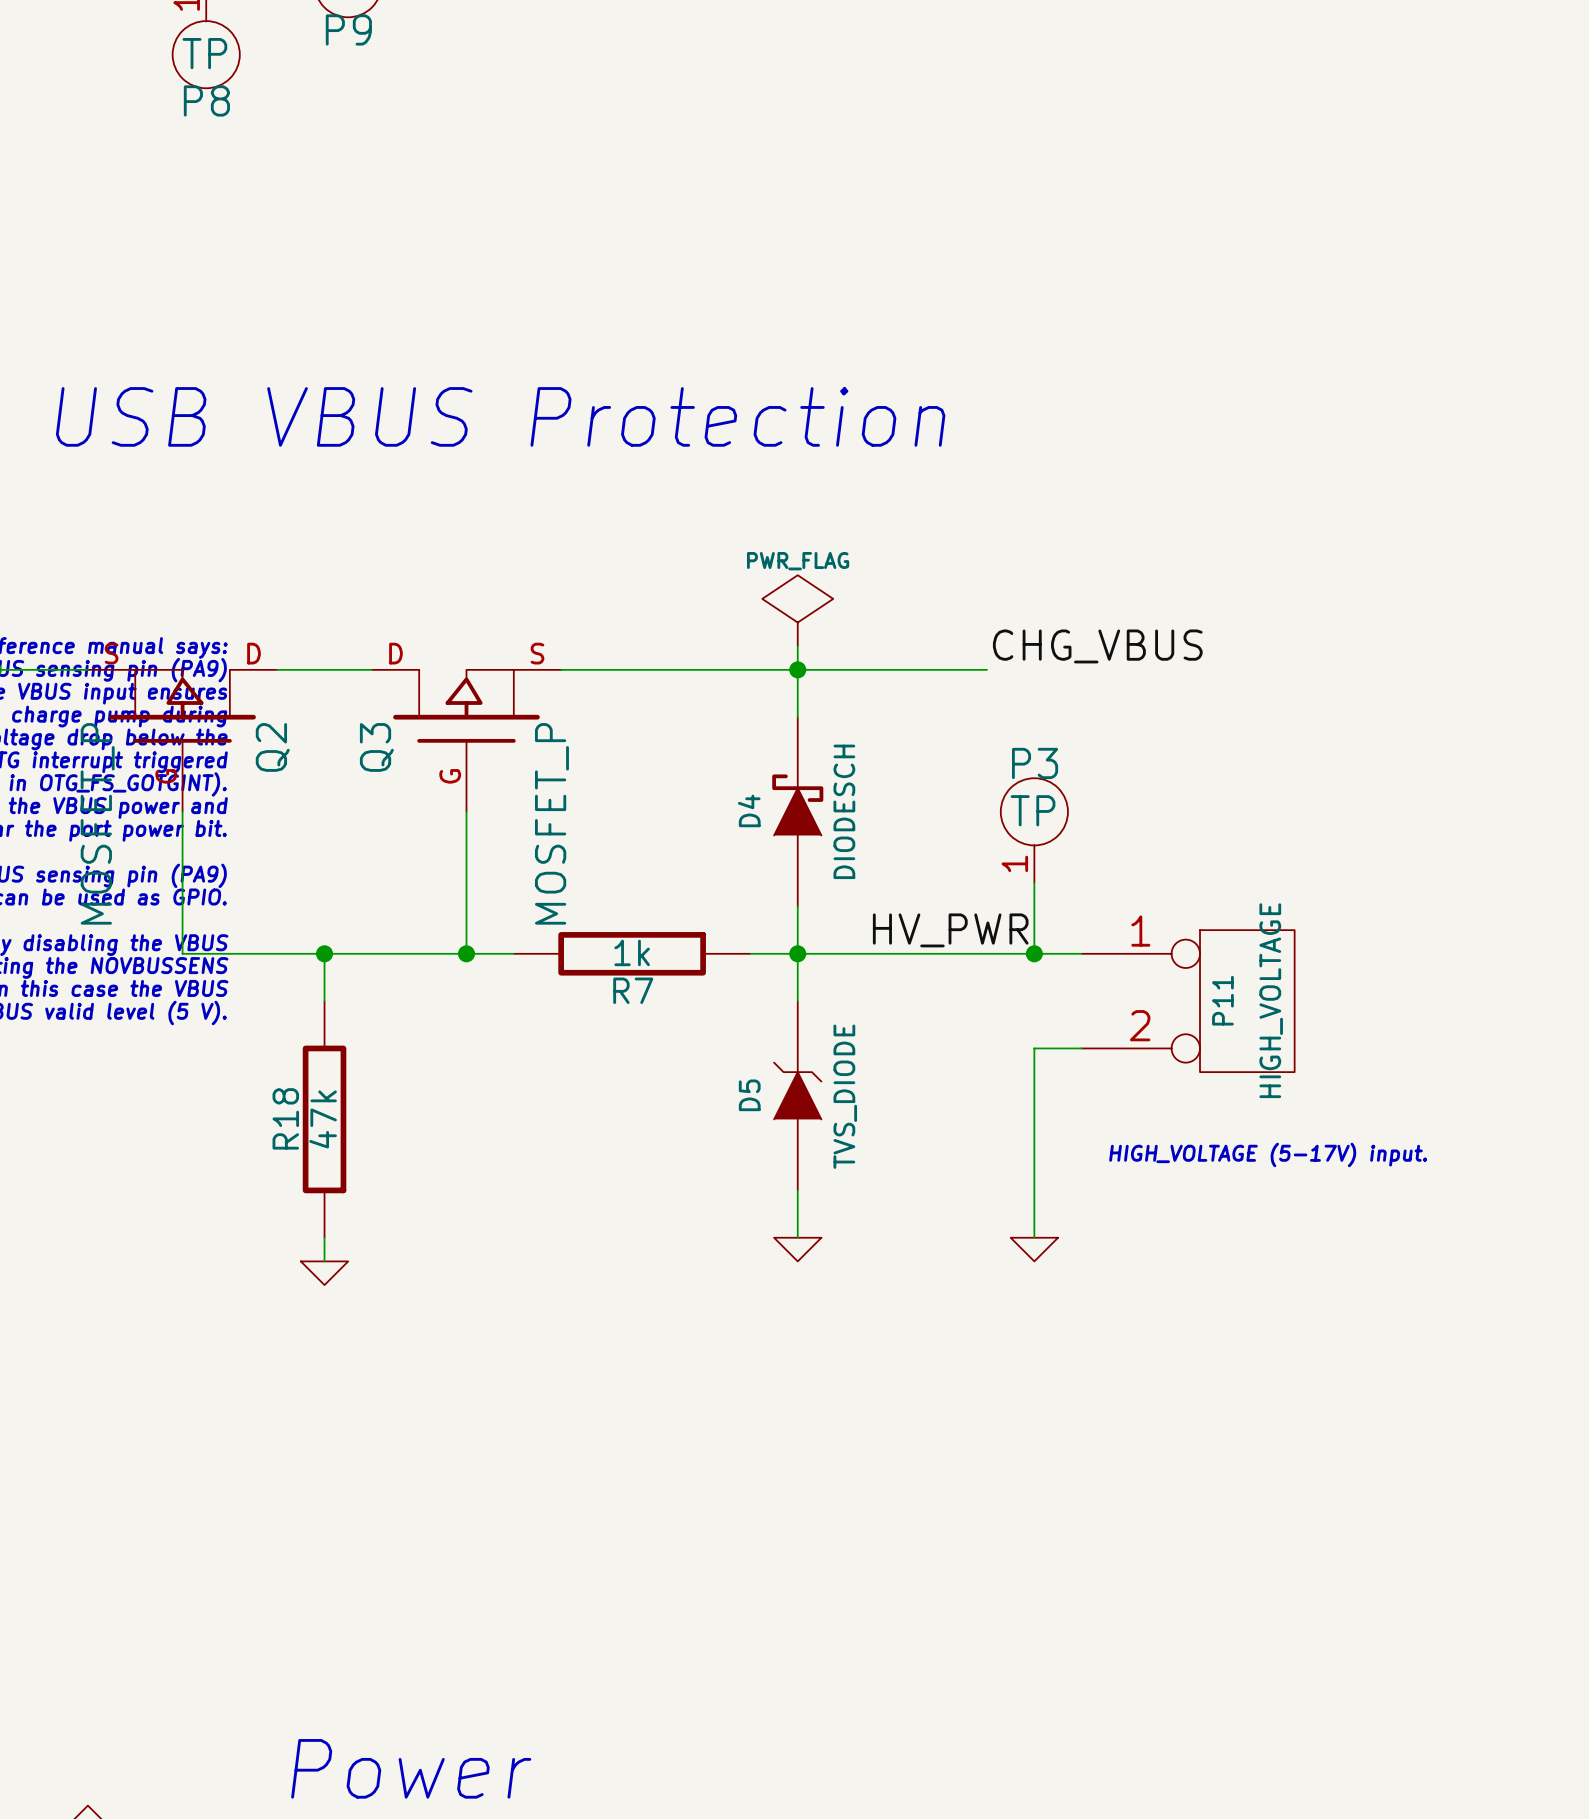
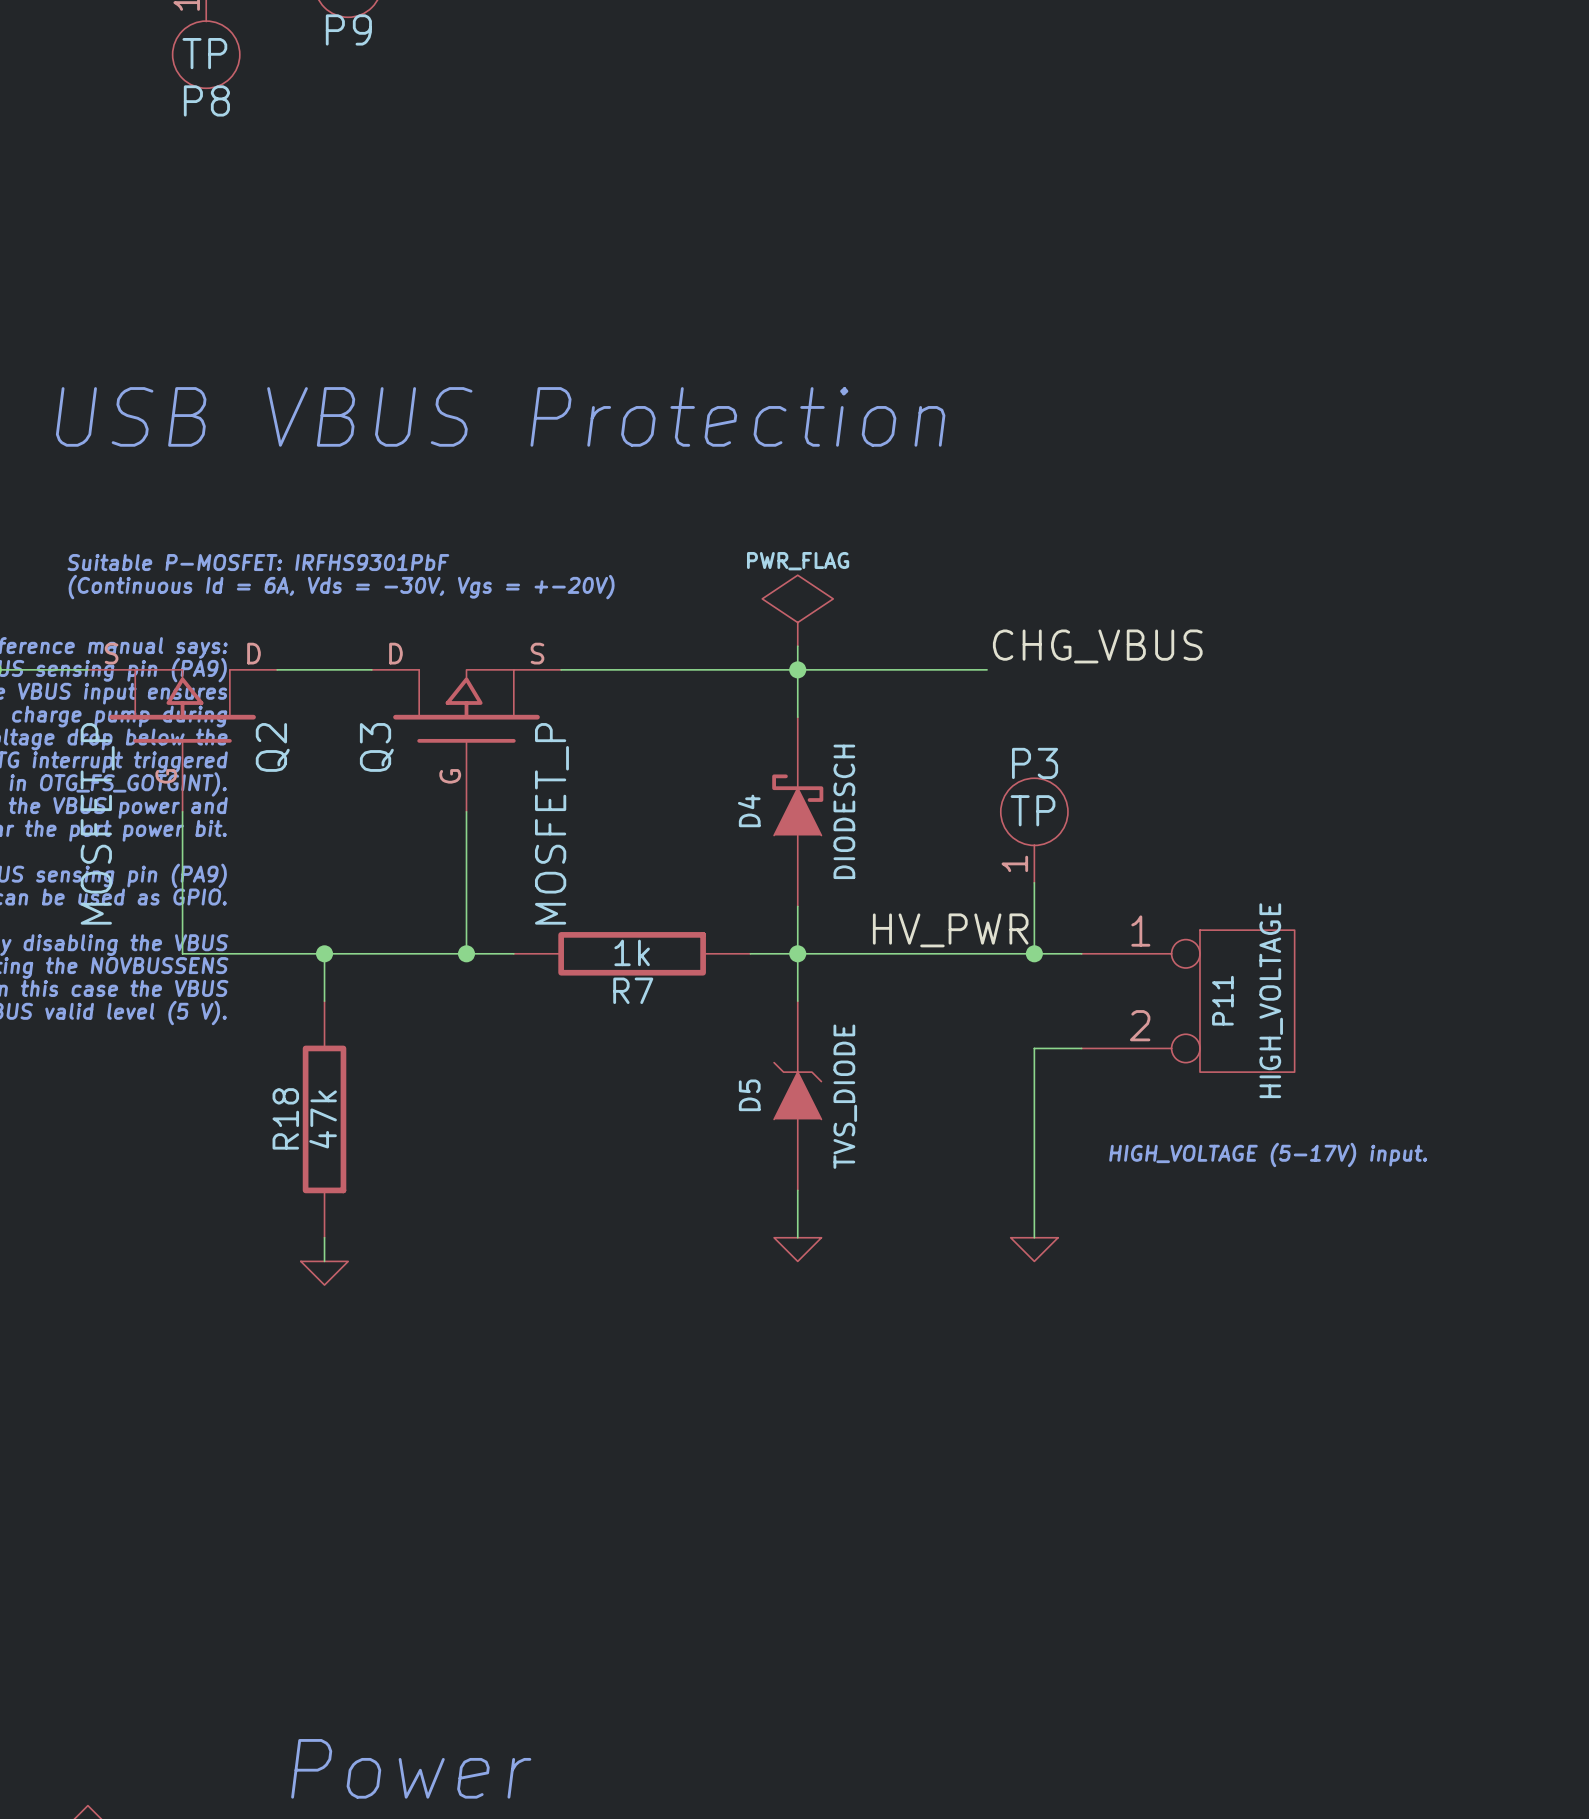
text: none -> Suitable P-MOSFET: IRFHS9301PbF (258, 562)
text: none -> (Continuous Id = 6A, Vds = -30V, Vgs = +-20V) (341, 587)

